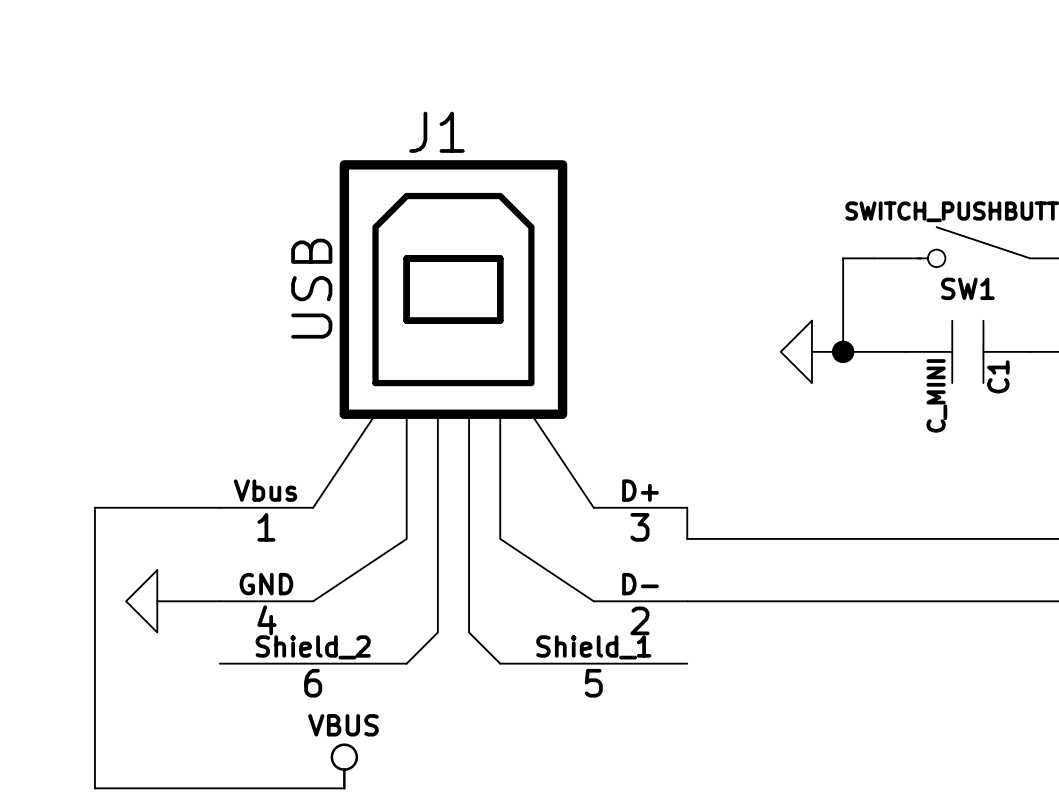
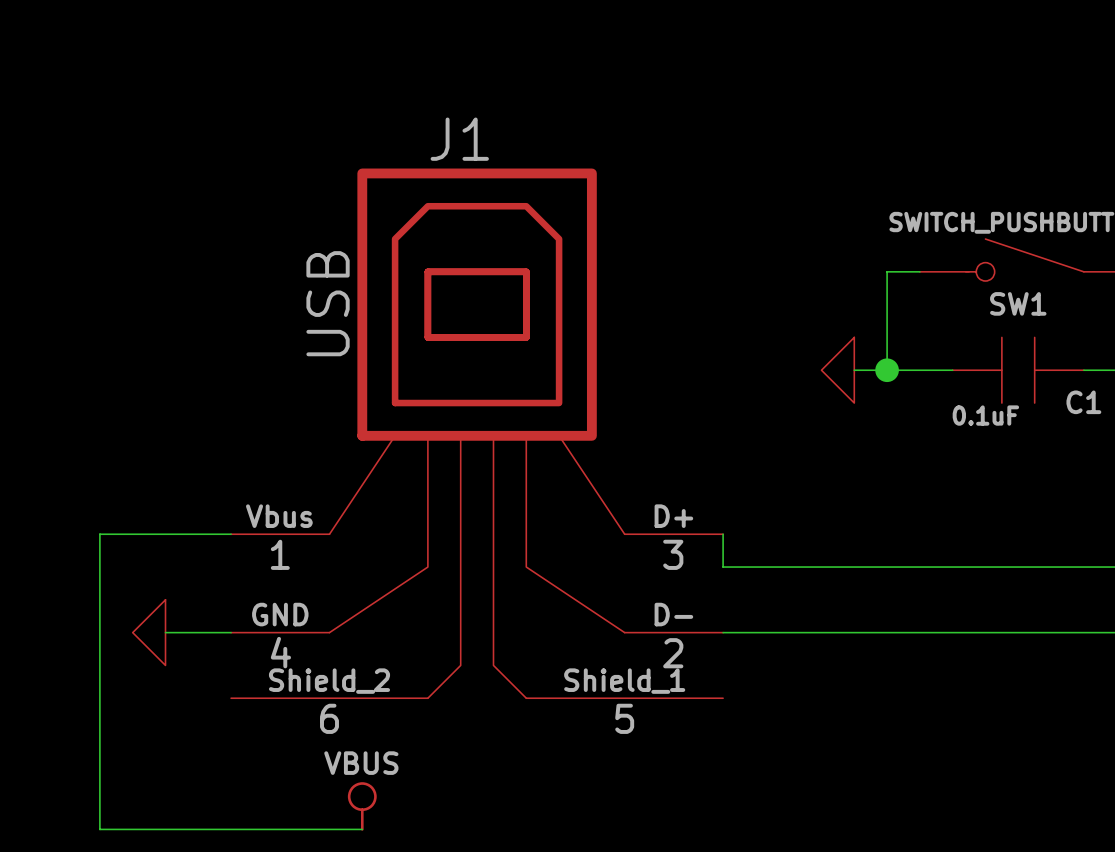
C1 name rotation: 0° (998, 376) -> 90° clockwise (1083, 402)
C1 value: C_MINI (936, 395) -> 0.1uF (985, 415)

